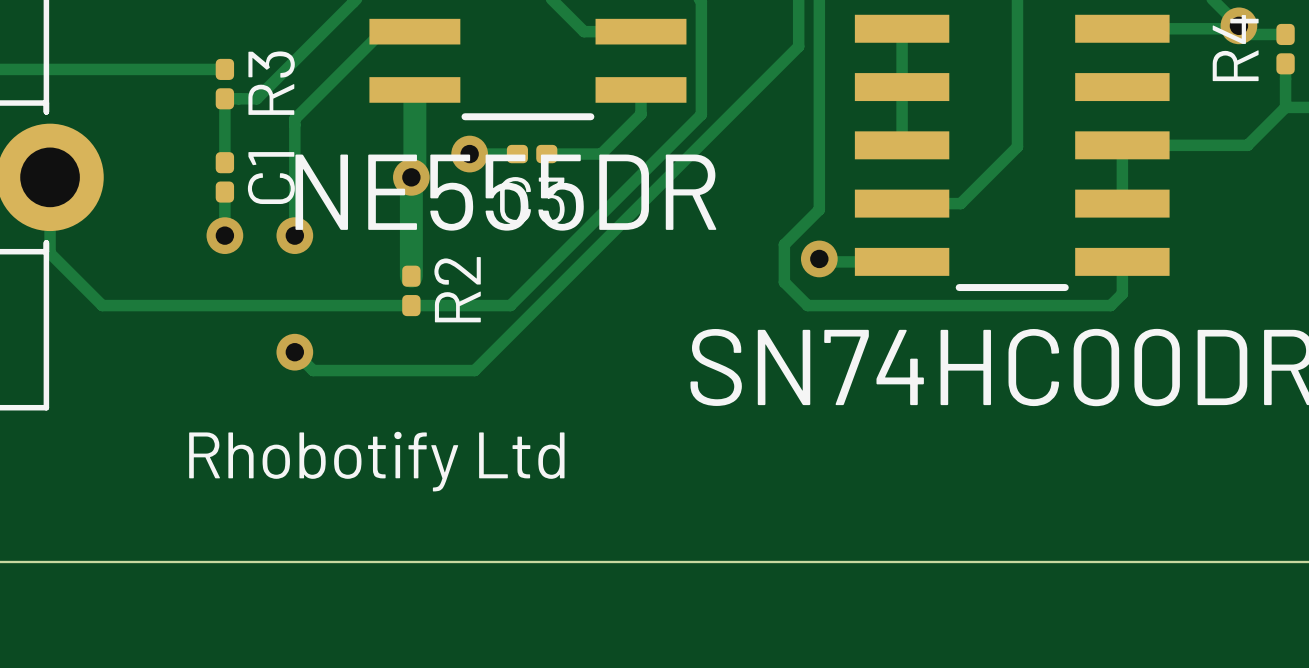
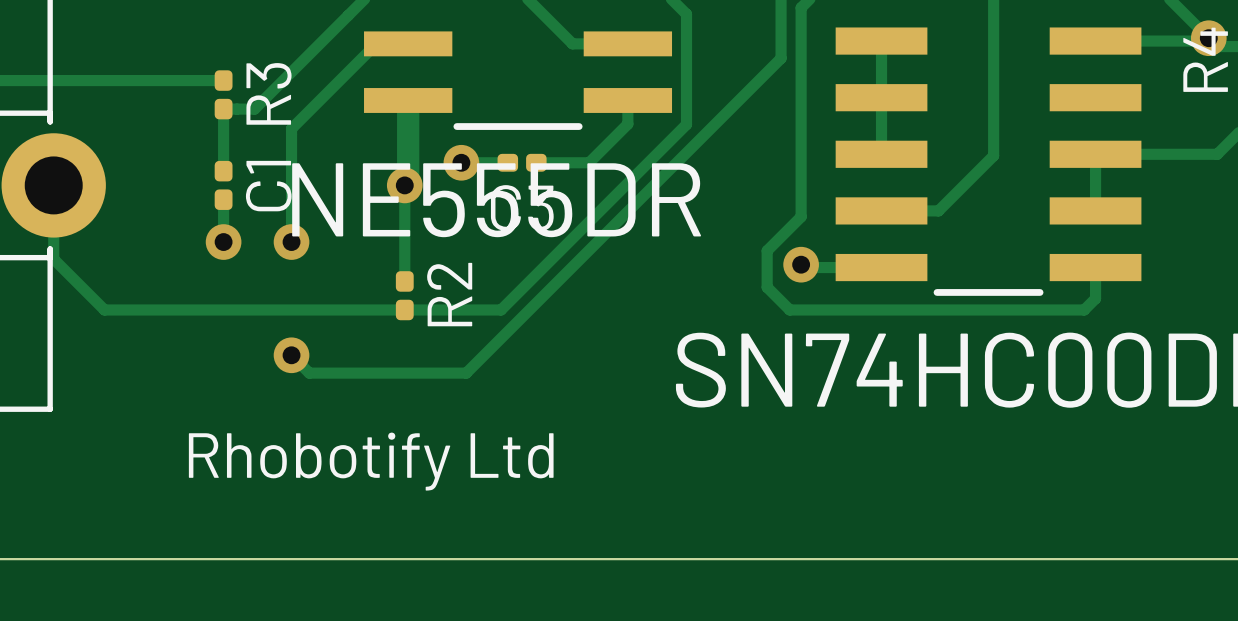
track width: thick (411, 177) (411, 276) -> thin (404, 185) (404, 281)

